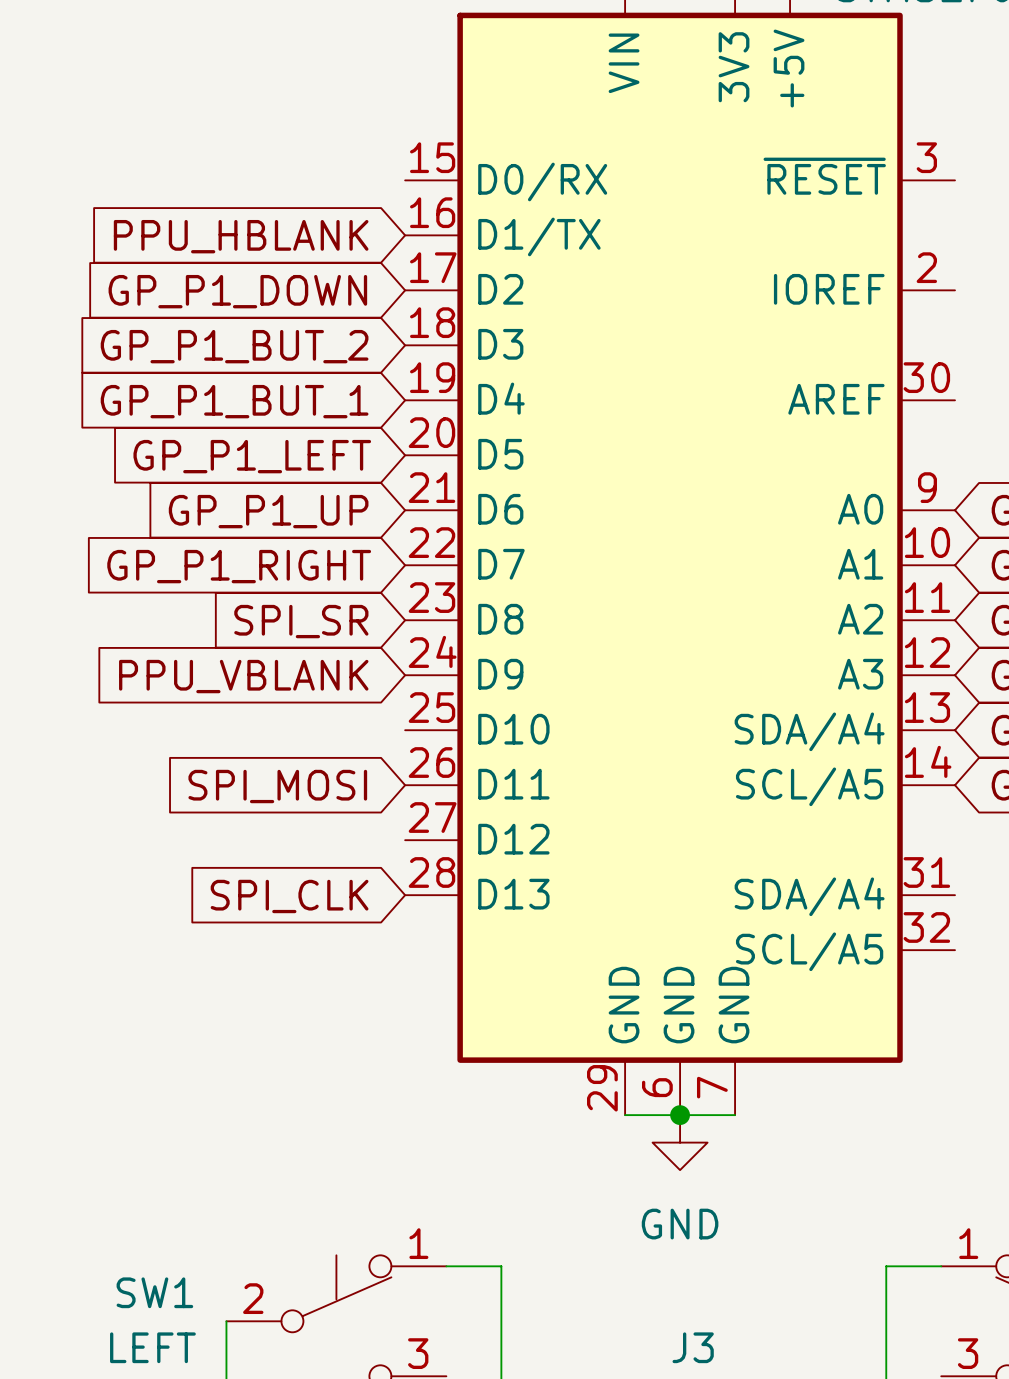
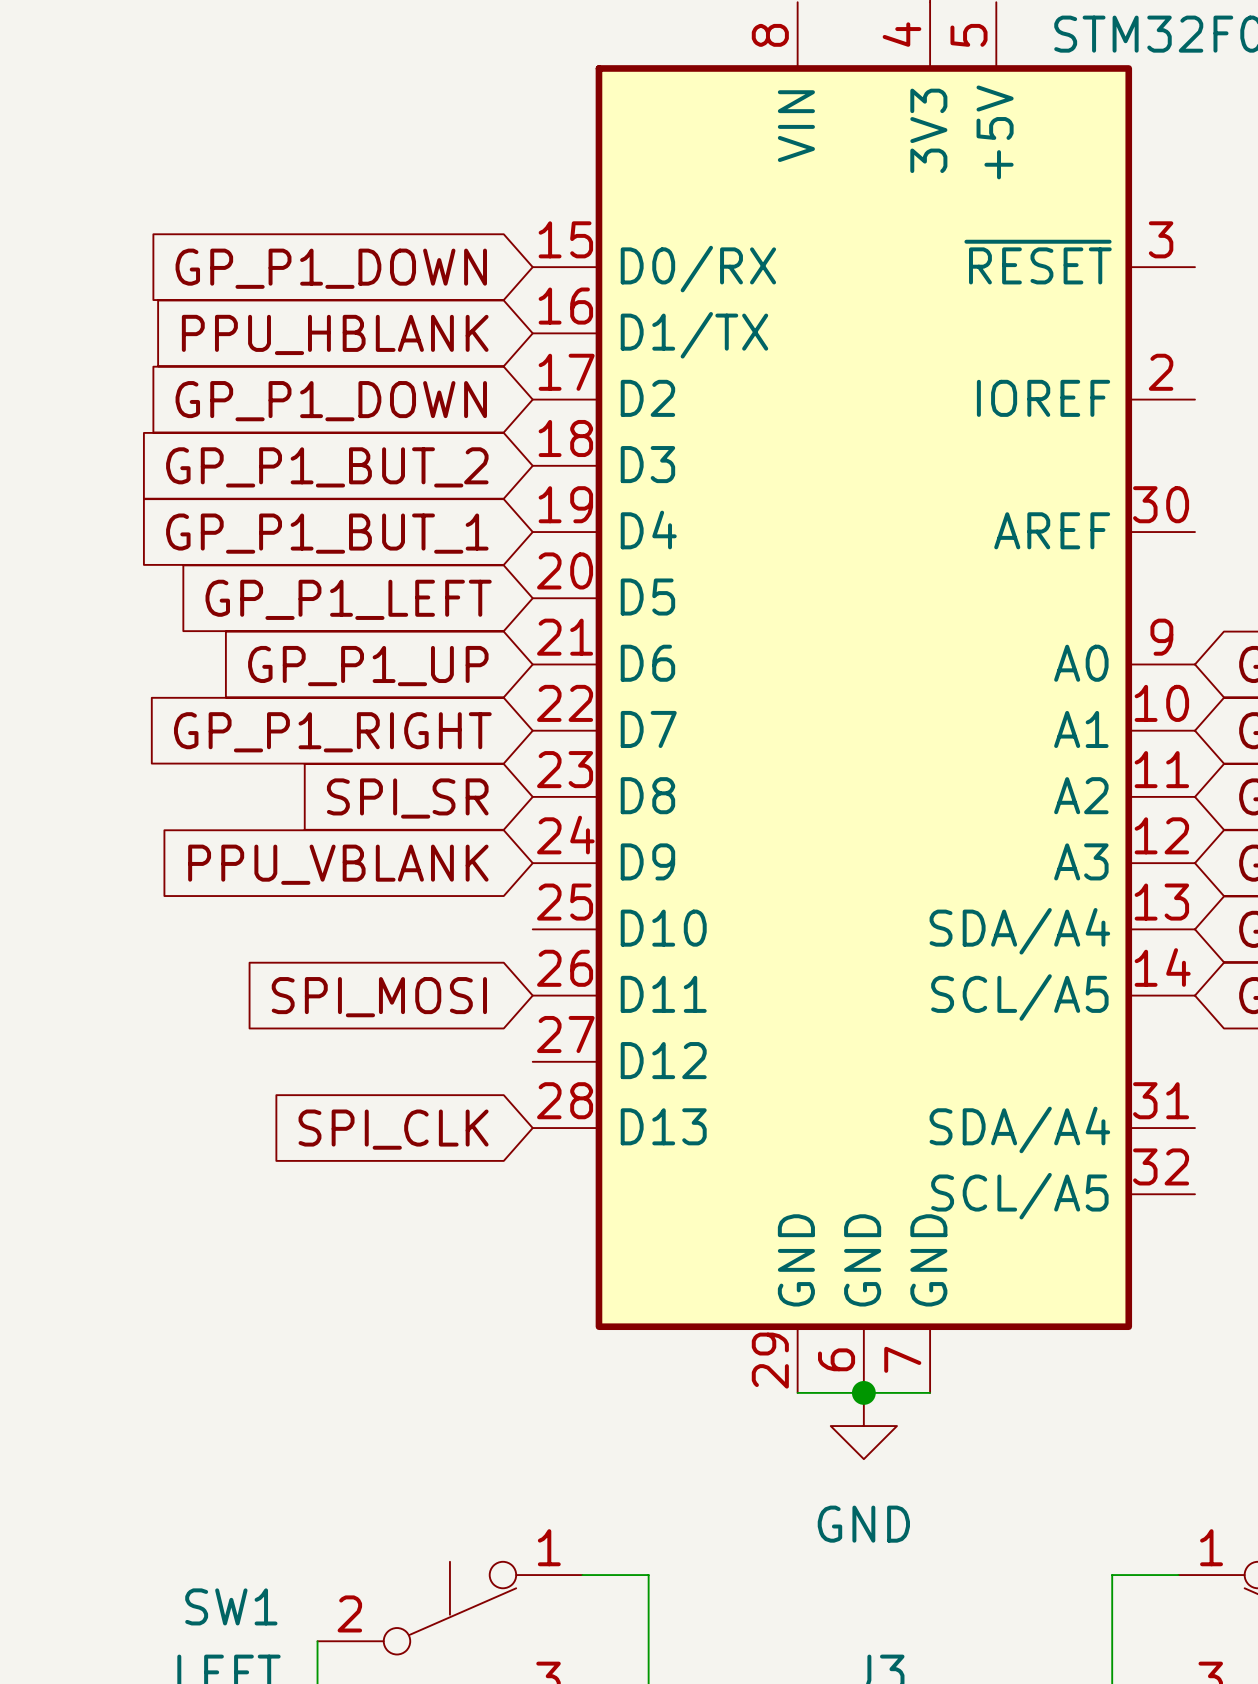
global label: none -> GP_P1_DOWN (331, 268)

